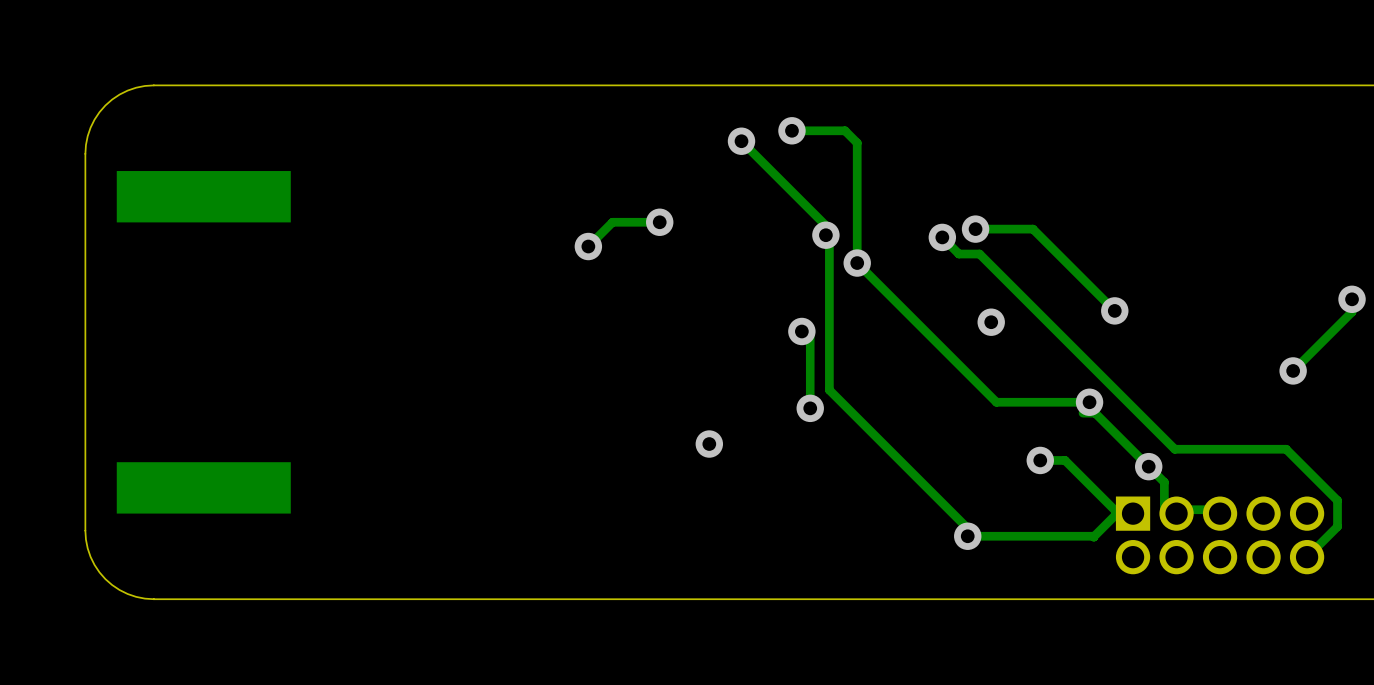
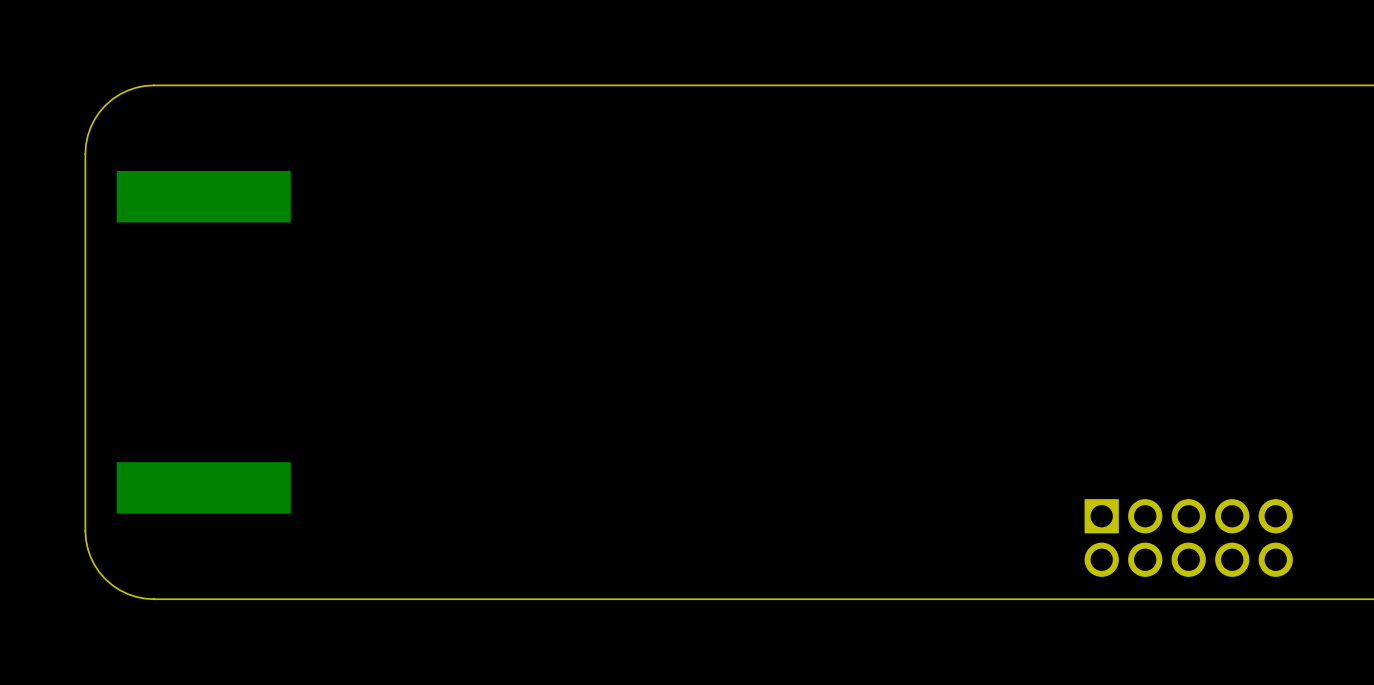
track: (791, 130) (845, 130) (857, 142) (857, 263) (996, 402) (1089, 402) -> none
via: (791, 130) -> none
track: (741, 141) (825, 225) (825, 236) (829, 240) (829, 390) (967, 528) (967, 536) (1093, 537) -> none
via: (741, 141) -> none
track: (659, 222) (612, 222) (588, 246) -> none
via: (659, 222) -> none
track: (975, 229) (1032, 229) (1114, 310) -> none
via: (975, 229) -> none
via: (825, 235) -> none
track: (942, 235) (958, 254) (979, 254) (1174, 449) (1286, 449) (1337, 500) (1337, 526) (1307, 557) (1304, 553) -> none
via: (942, 237) -> none
via: (588, 246) -> none
via: (857, 263) -> none
track: (1352, 299) (1352, 312) (1293, 370) -> none
via: (1352, 299) -> none
via: (1114, 310) -> none
via: (991, 322) -> none
via: (801, 331) -> none
track: (810, 336) (810, 408) -> none
via: (1293, 370) -> none
via: (1089, 402) -> none
via: (810, 408) -> none
track: (1083, 413) (1095, 413) (1164, 482) (1164, 509) (1207, 509) -> none
via: (709, 444) -> none
via: (1040, 460) -> none
track: (1040, 463) (1040, 460) (1065, 460) (1118, 513) (1133, 513) -> none
via: (1148, 466) -> none
track: (1120, 509) (1093, 536) -> none
part position: (1220, 535) -> (1188, 538)
via: (967, 536) -> none

